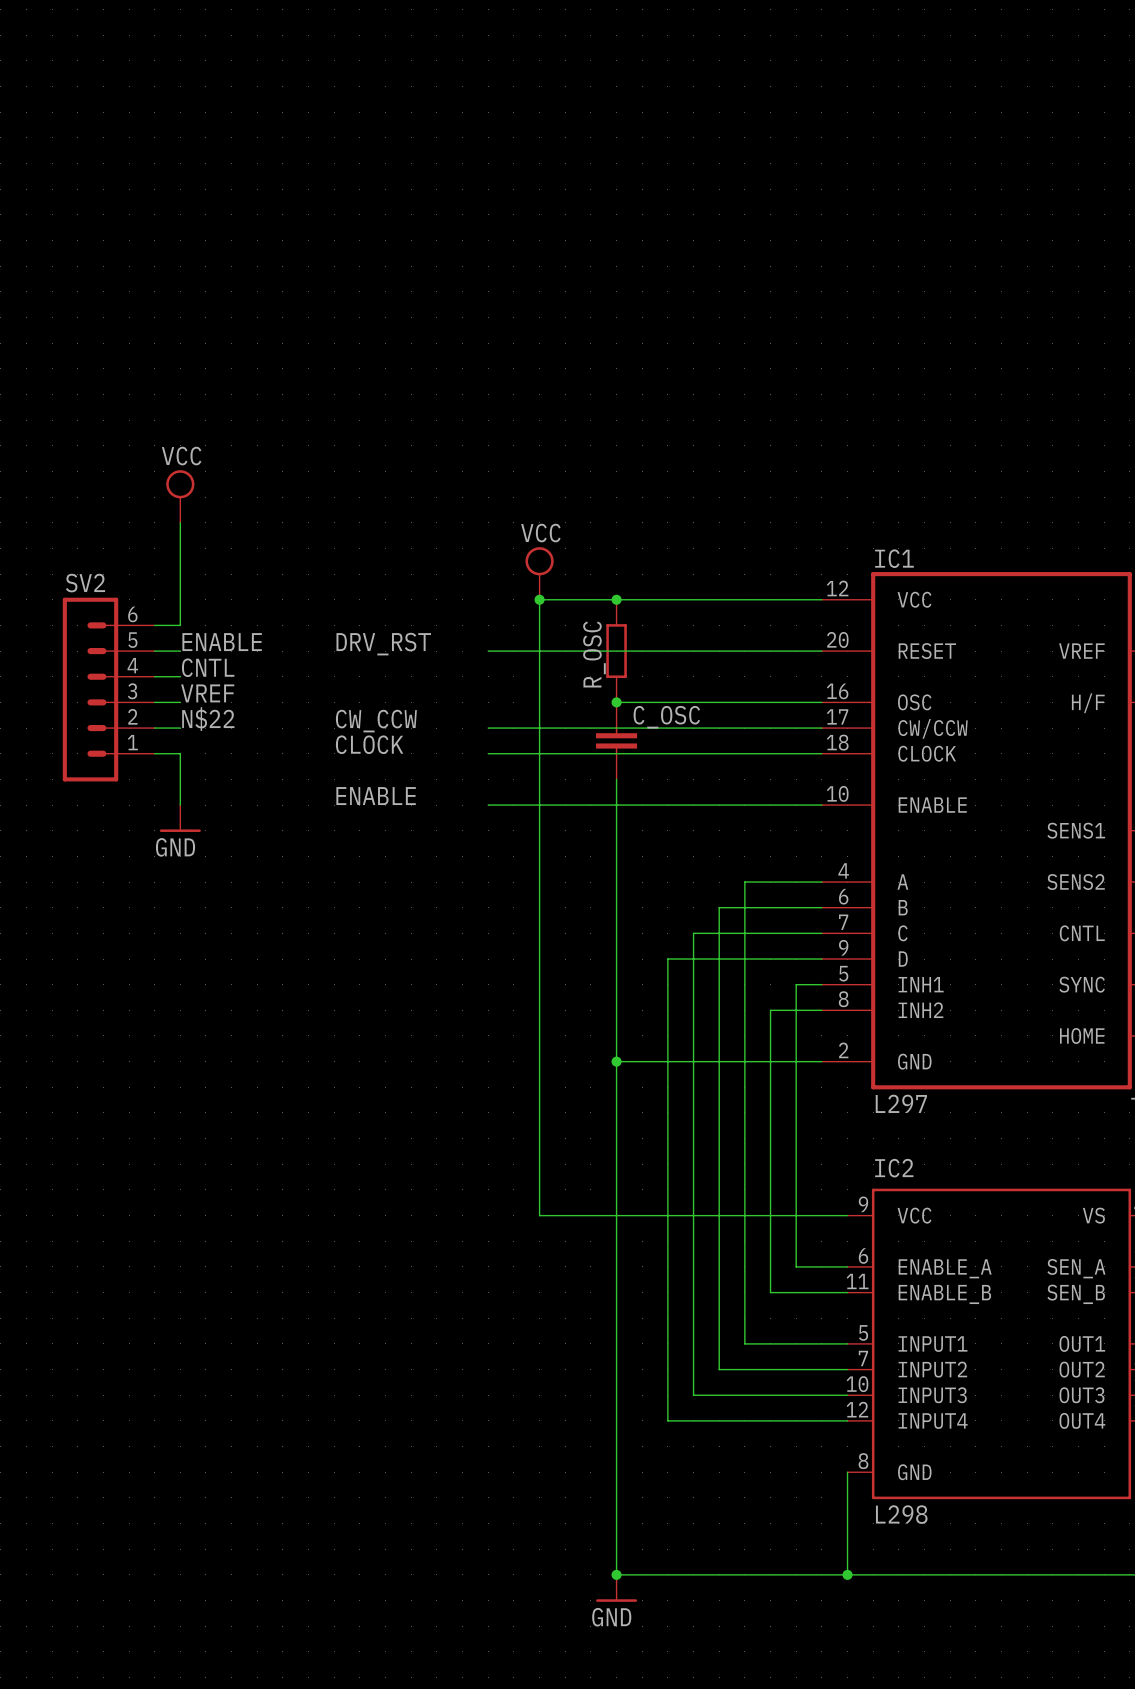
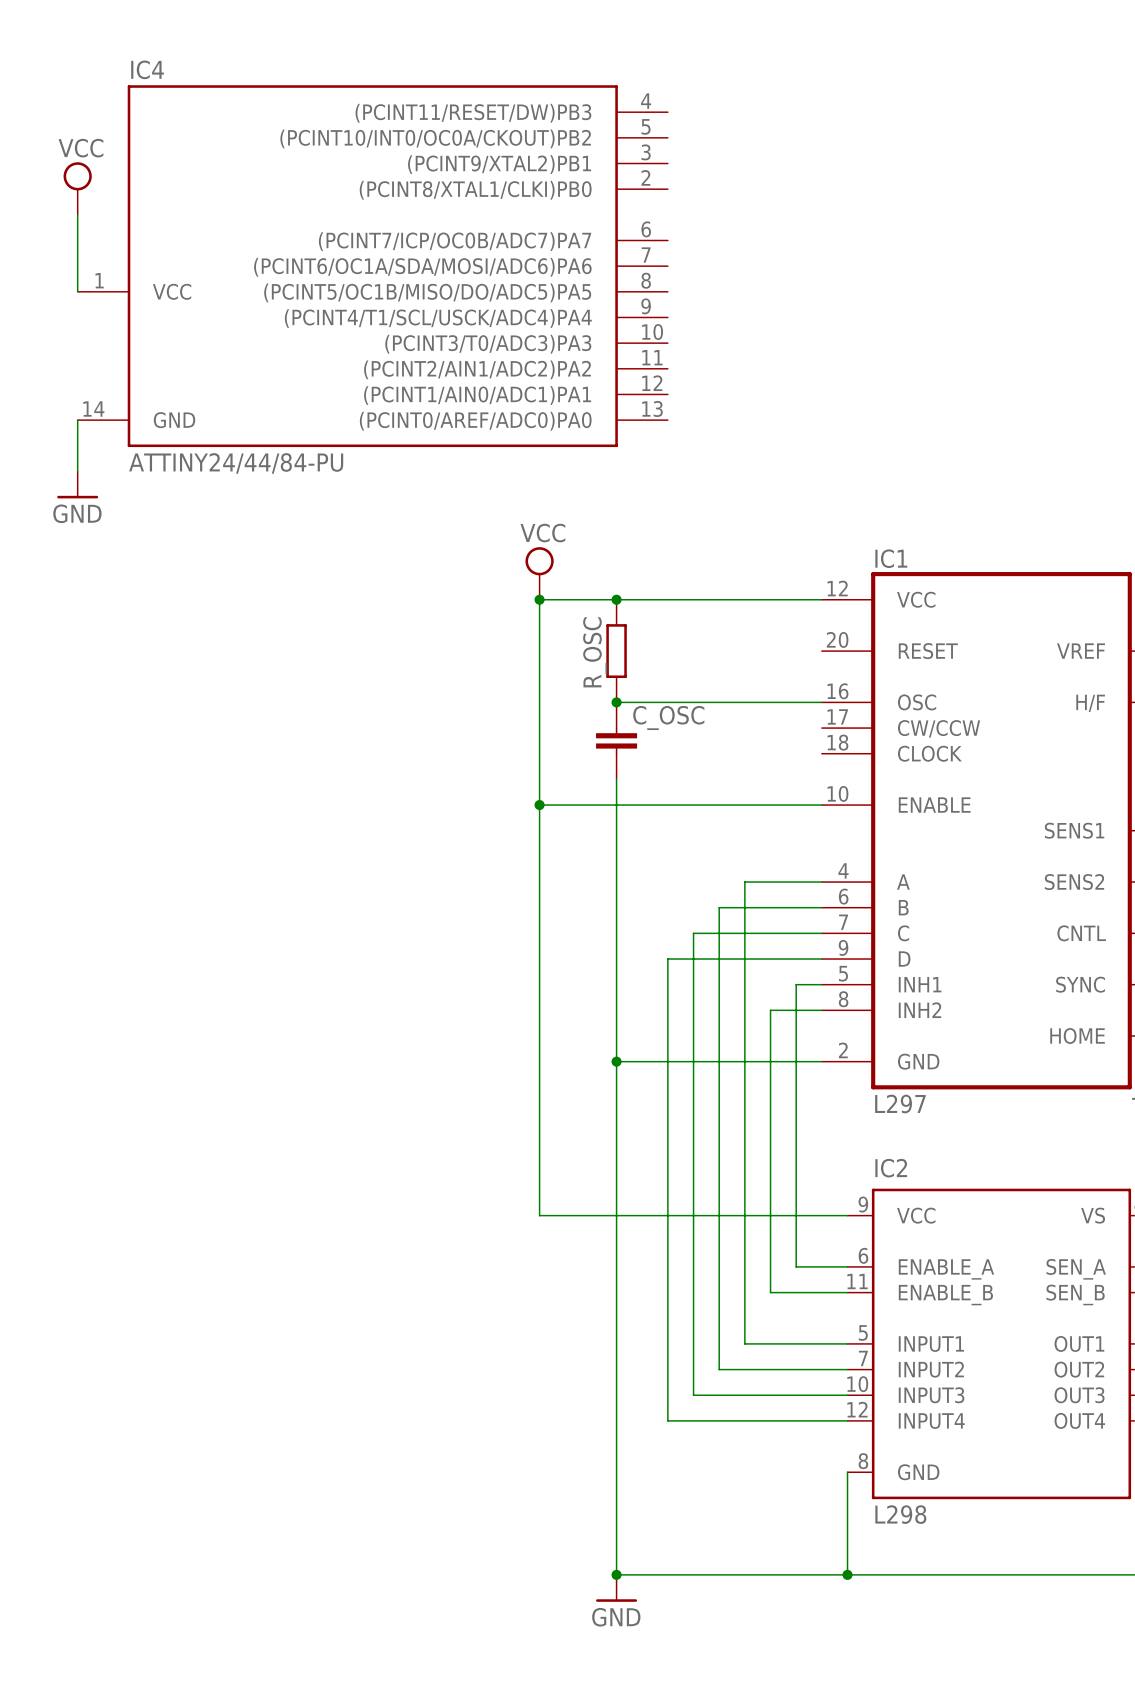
power symbol: none -> VCC (77, 188)
wire: none -> (77, 214) (77, 291)
IC4: none -> ATTINY24/44/84-PU (372, 266)
wire: none -> (77, 420) (77, 471)
power symbol: none -> GND (77, 484)
power symbol: VCC (180, 496) -> none
wire: (180, 522) (180, 625) (154, 625) -> none
label: ENABLE (222, 642) -> none
label: DRV_RST (383, 644) -> none
wire: (154, 651) (180, 651) -> none
wire: (488, 651) (821, 651) -> none
label: CNTL (208, 667) -> none
wire: (154, 676) (180, 676) -> none
SV2: (108, 689) -> none
label: VREF (207, 693) -> none
wire: (154, 702) (180, 702) -> none
label: N$22 (208, 719) -> none
label: CW_CCW (376, 721) -> none
wire: (154, 728) (180, 728) -> none
wire: (488, 728) (821, 728) -> none
label: CLOCK (369, 744) -> none
wire: (154, 753) (180, 753) (180, 805) -> none
wire: (488, 753) (821, 753) -> none
label: ENABLE (376, 796) -> none
wire: (488, 805) (539, 805) -> none
junction: none -> (539, 805)
power symbol: GND (180, 818) -> none

